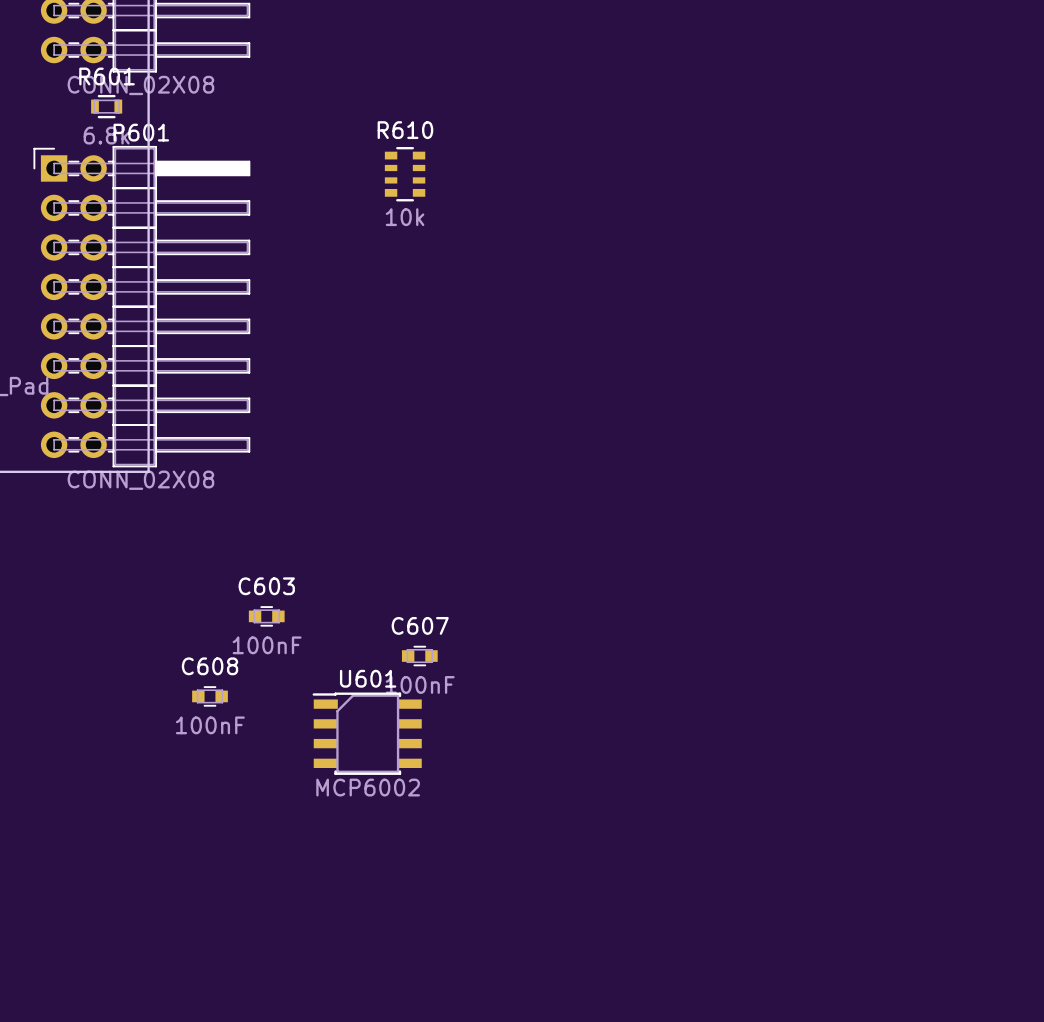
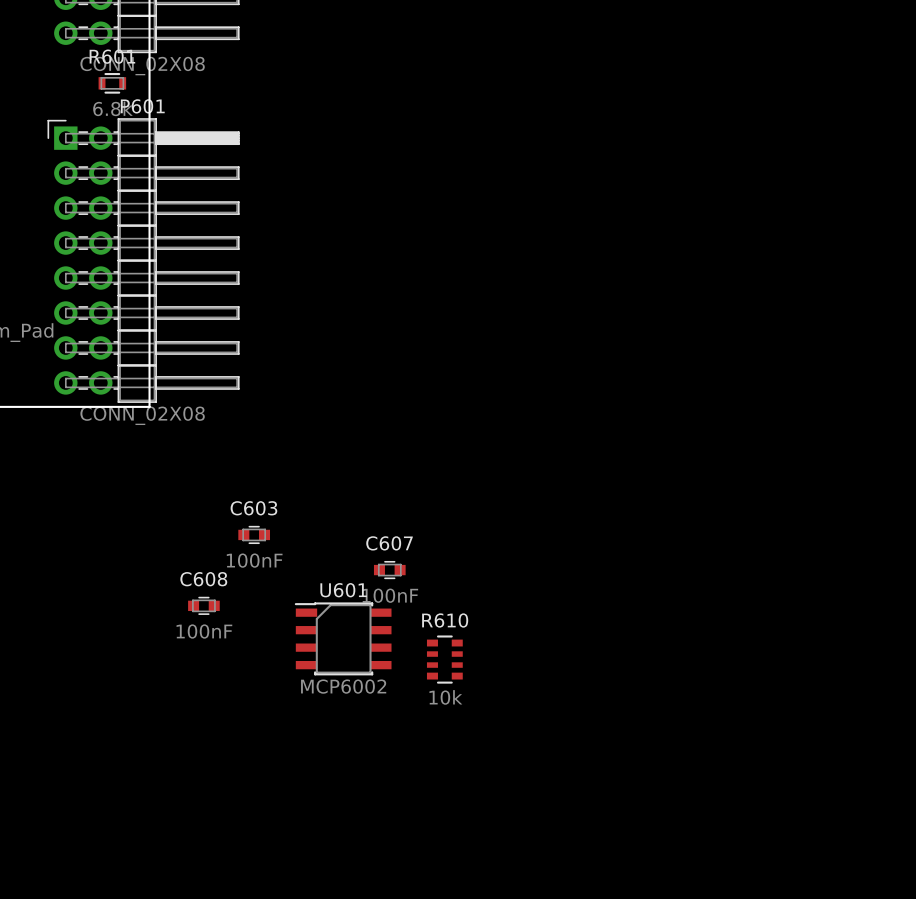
R610 position: (405, 174) -> (444, 659)

